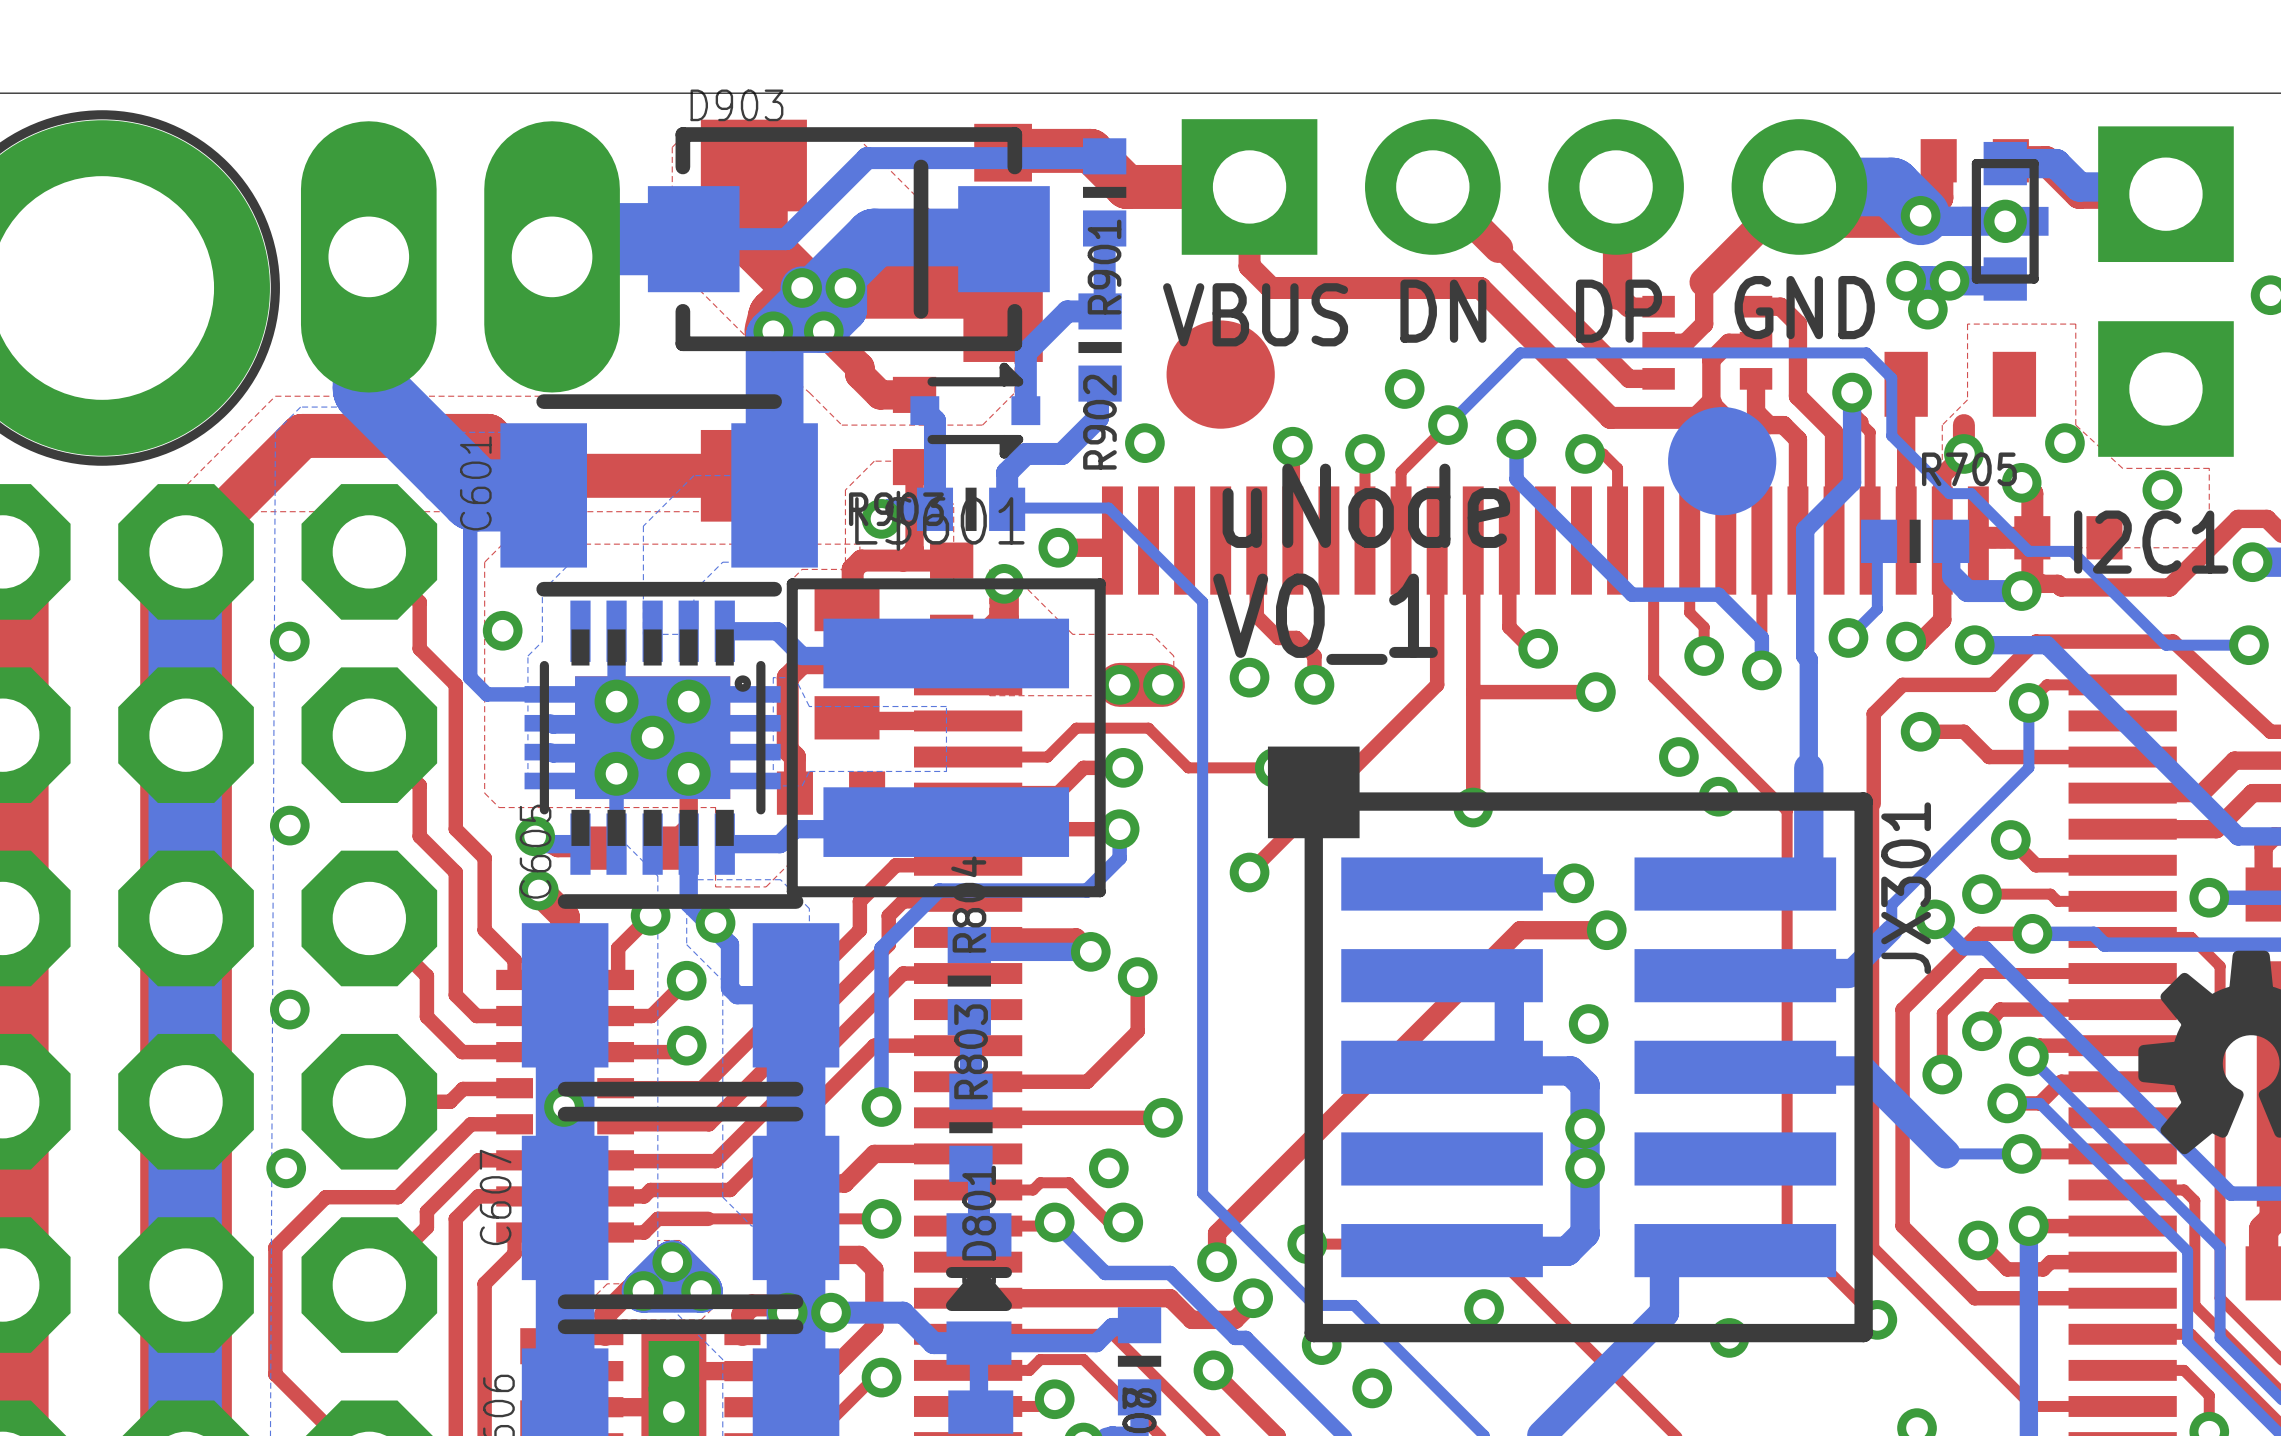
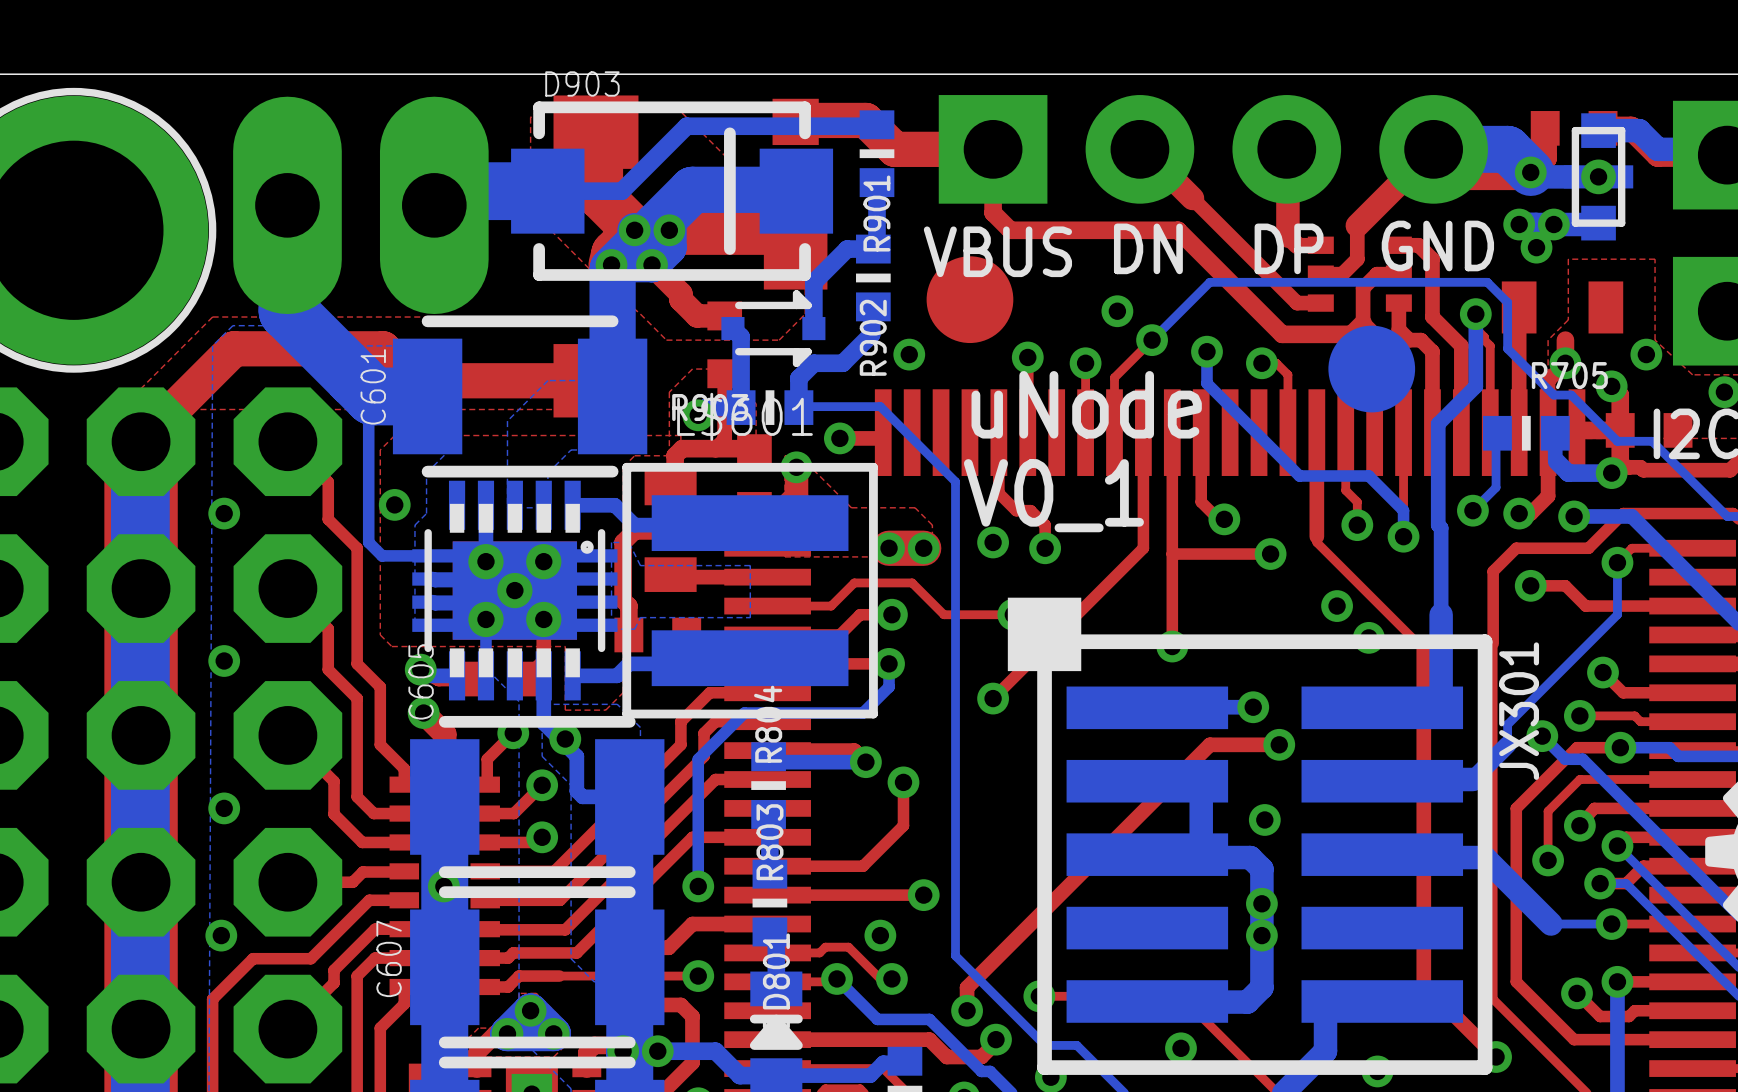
top track width: thin (1653, 540) (1653, 670) -> thick (1316, 432) (1316, 536)
top track width: thin (1787, 811) (1787, 1229) (1877, 1319) -> thick (1423, 649) (1423, 984) (1496, 1057)

